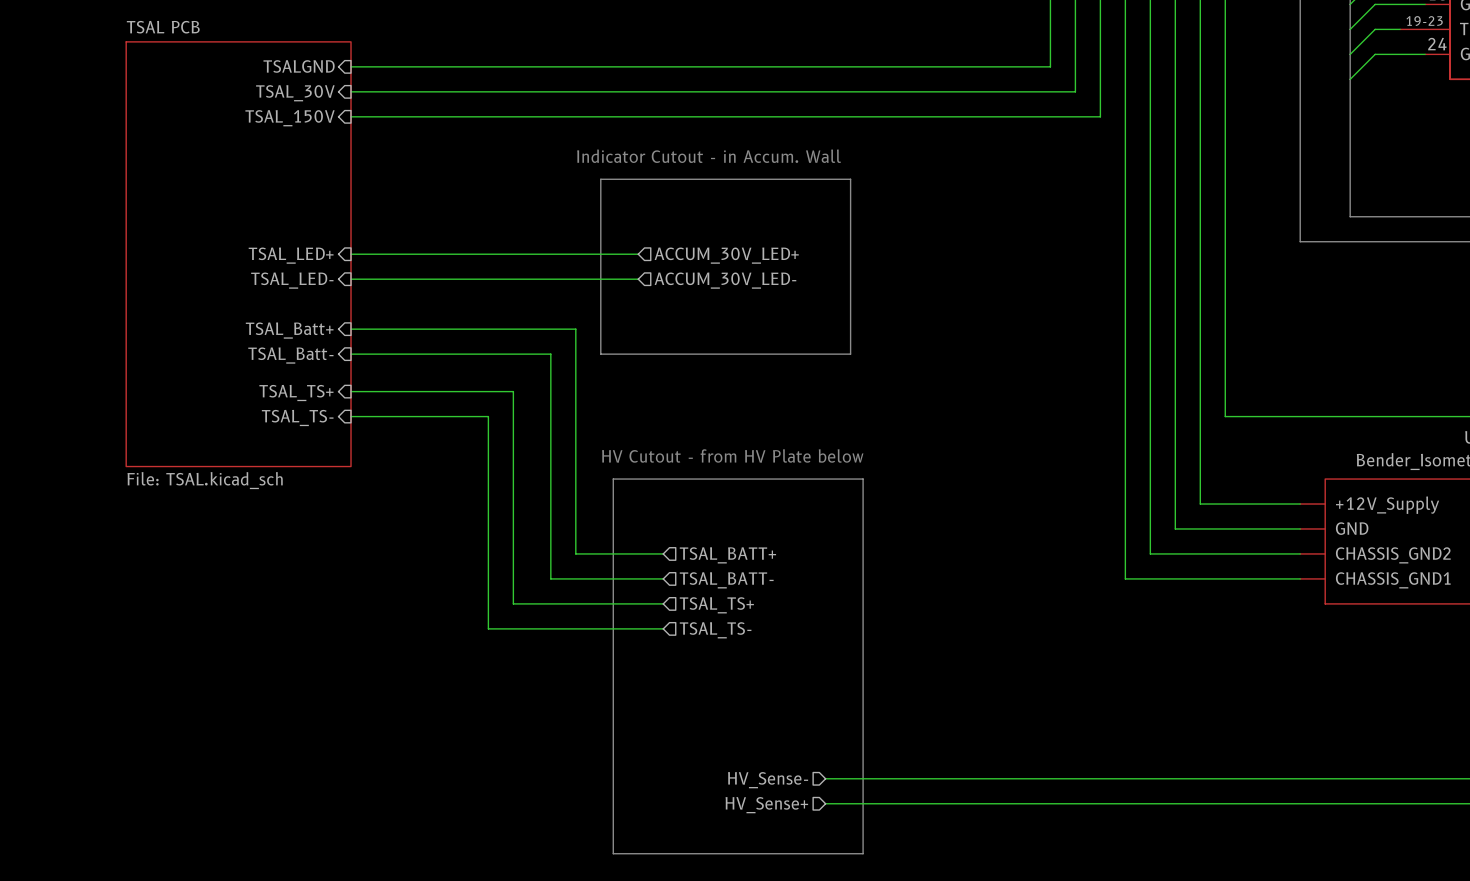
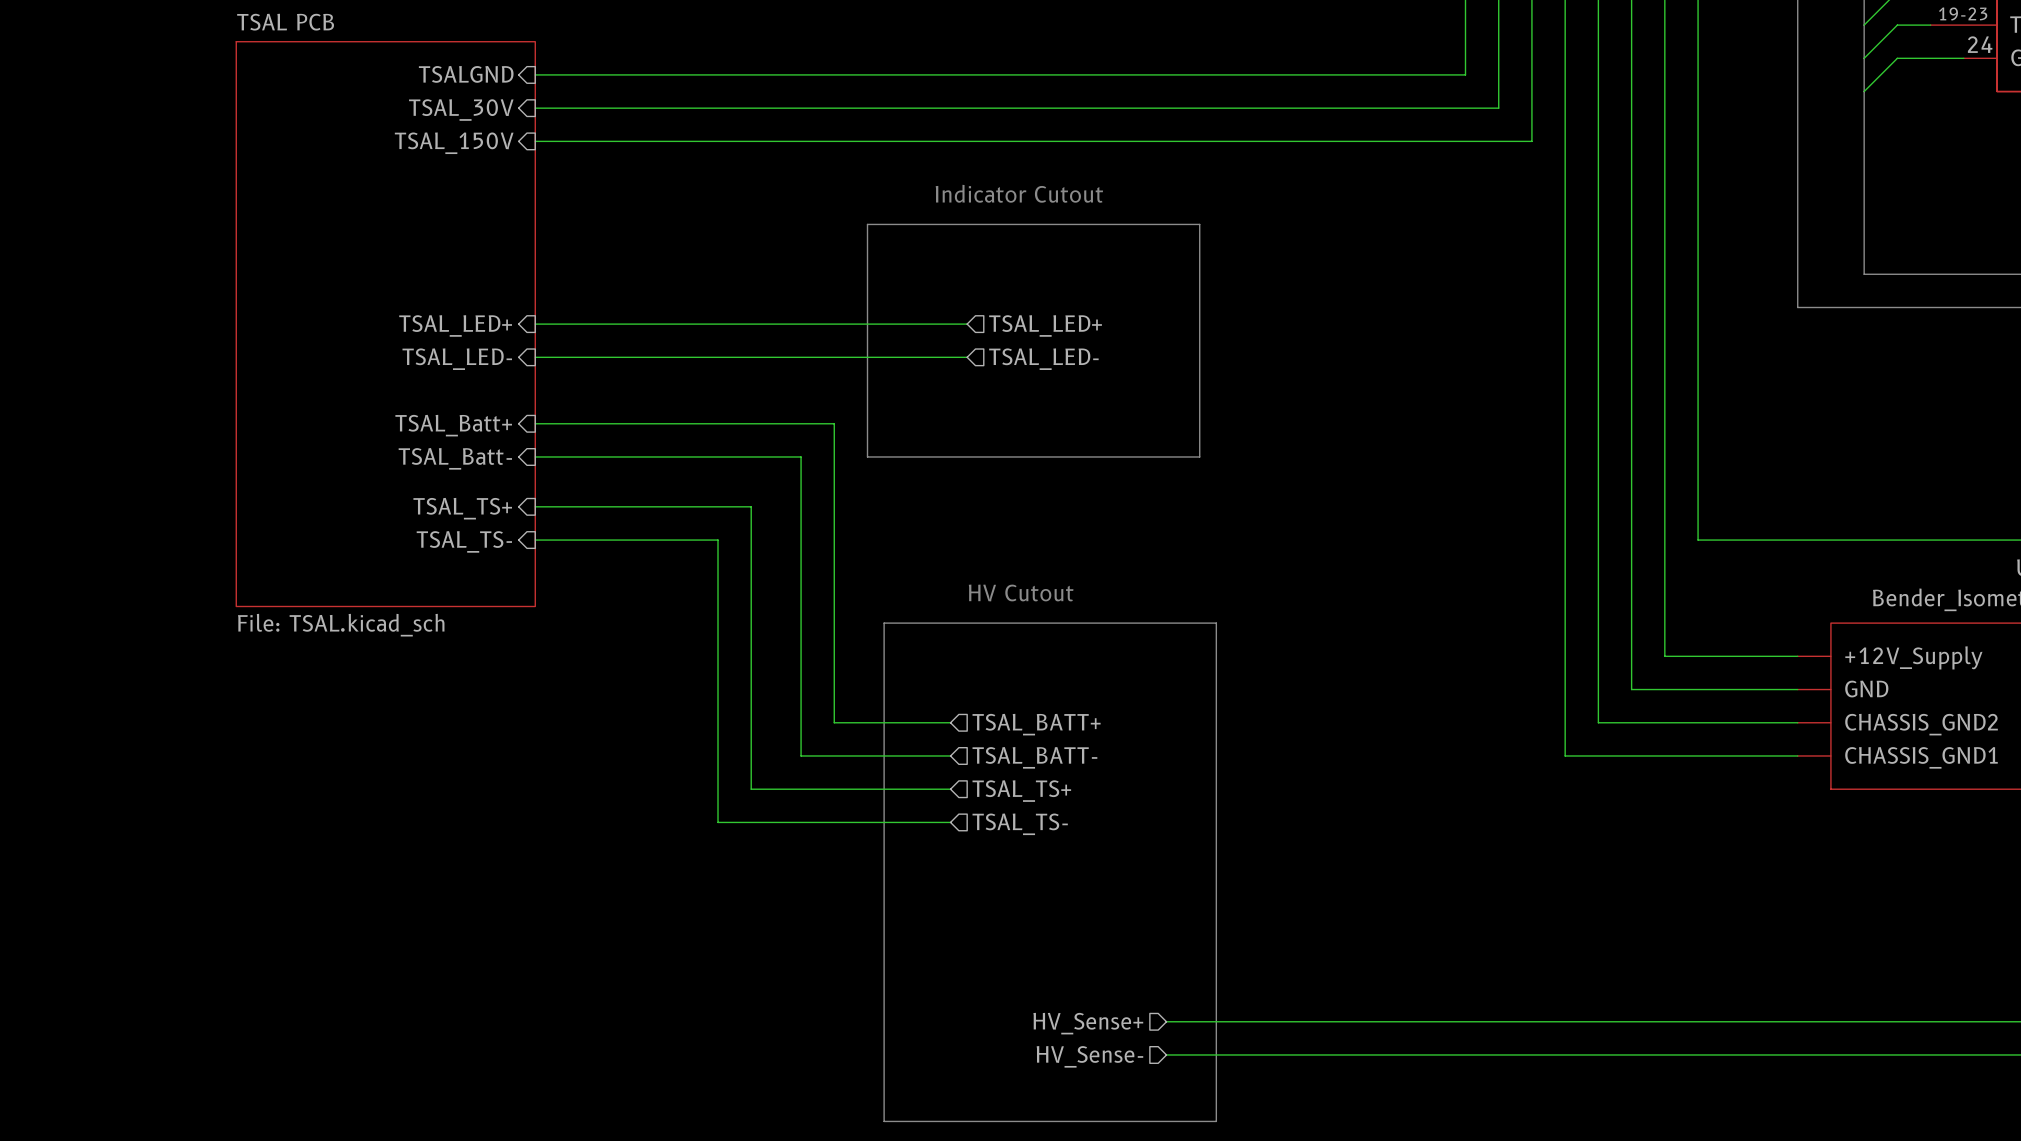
text: Indicator Cutout - in Accum. Wall (709, 156) -> Indicator Cutout (1019, 193)
wire: none -> (917, 324) (967, 324)
hierarchical label: ACCUM_30V_LED+ (726, 255) -> none
hierarchical label: none -> TSAL_LED+ (1045, 325)
wire: none -> (917, 357) (967, 357)
hierarchical label: ACCUM_30V_LED- (725, 280) -> none
hierarchical label: none -> TSAL_LED- (1043, 359)
text: HV Cutout - from HV Plate below (732, 455) -> none
text: none -> HV Cutout (1021, 592)
hierarchical label: HV_Sense- (768, 780) -> HV_Sense+ (1088, 1023)
hierarchical label: HV_Sense+ (766, 805) -> HV_Sense- (1089, 1056)

